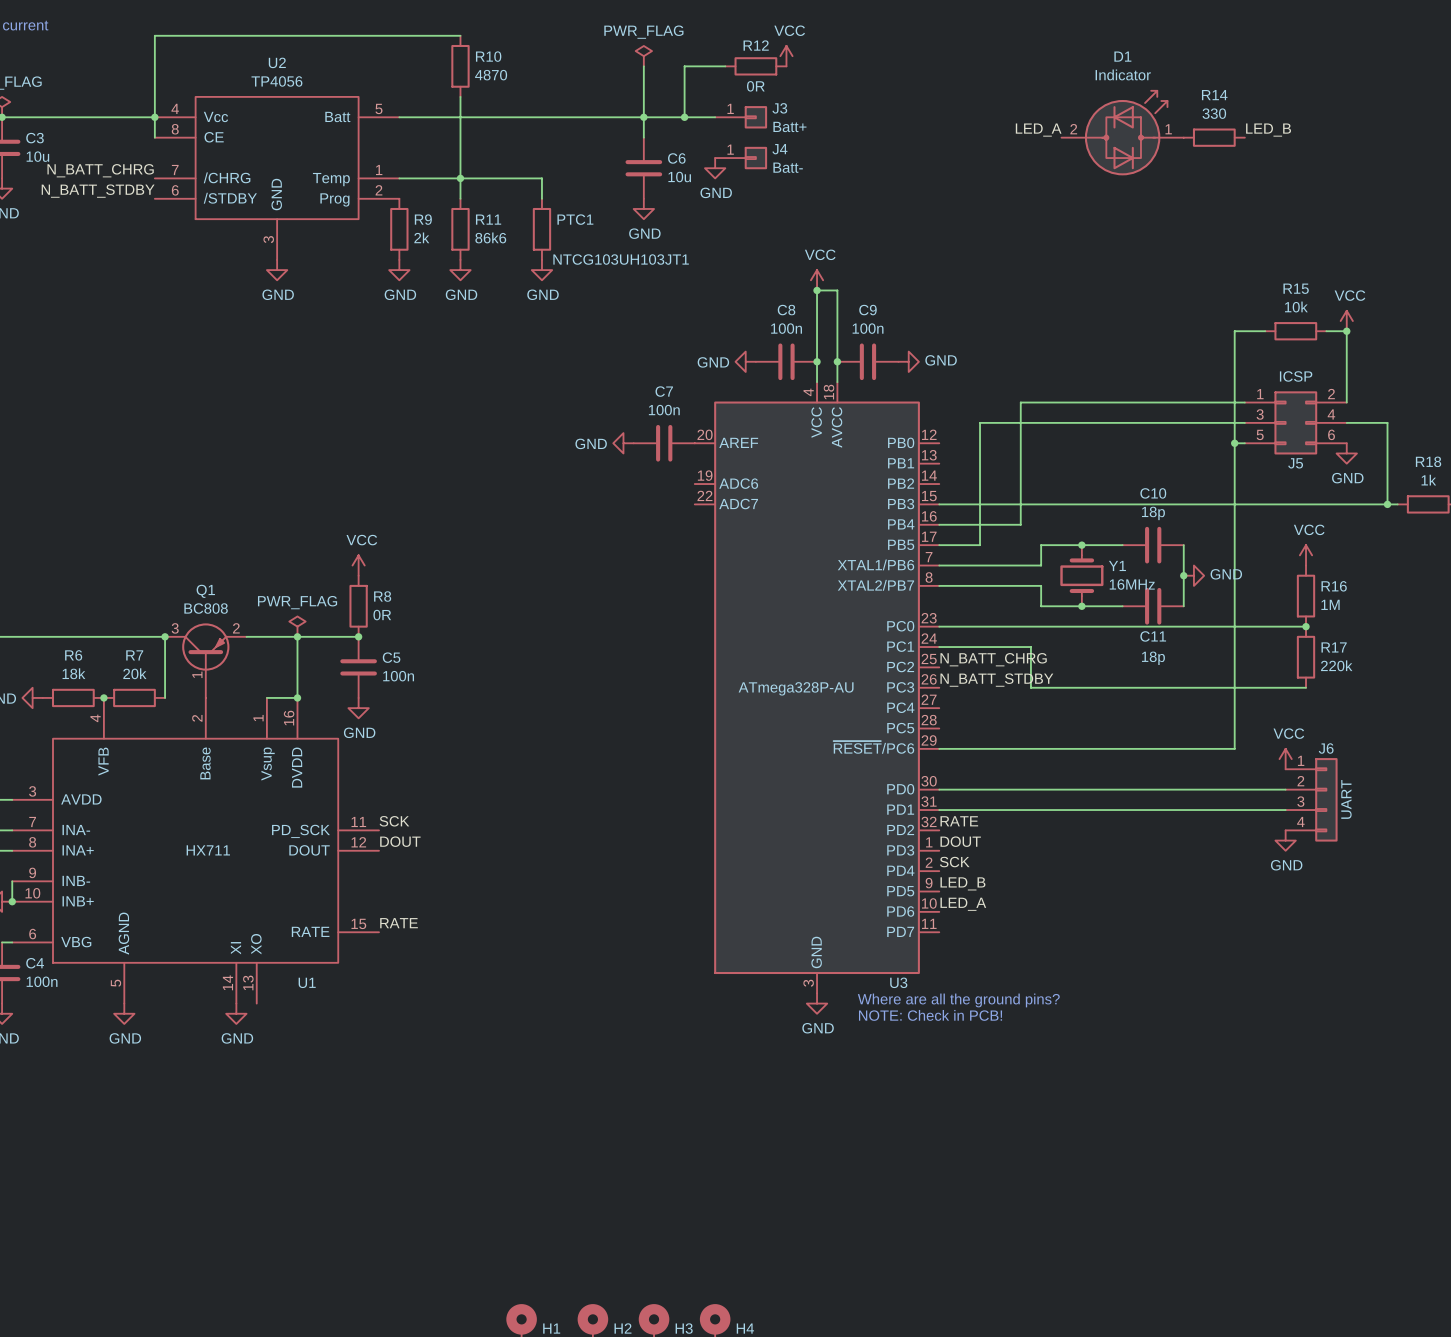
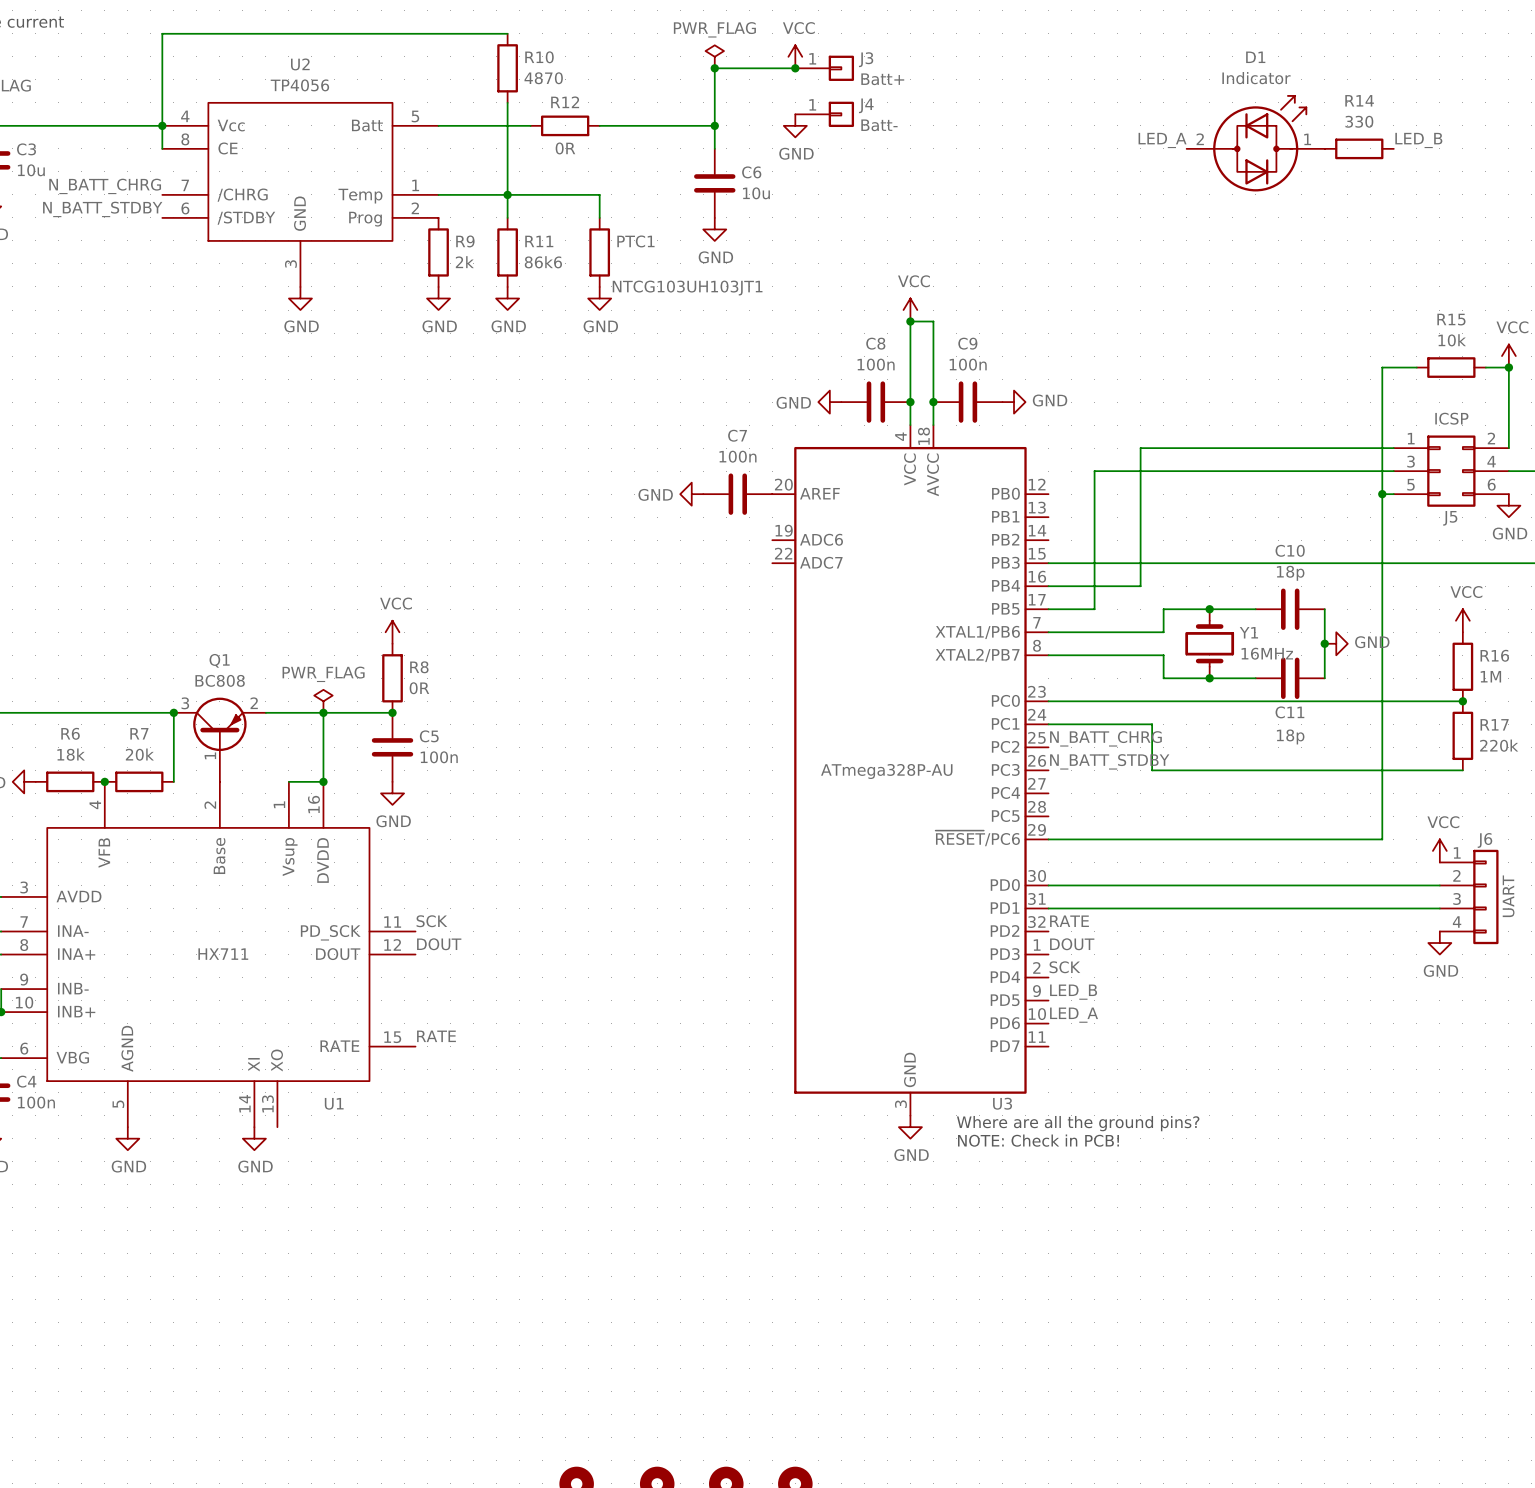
power symbol position: VCC (786, 56) -> VCC (795, 56)
junction: none -> (714, 68)
wire: (684, 66) (684, 117) -> (760, 68) (714, 68)
junction: none -> (795, 68)
R12 position: (755, 66) -> (565, 125)
wire: (480, 117) (541, 117) -> none
wire: (643, 117) (715, 117) -> none
junction: (684, 117) -> none
J3 position: (741, 117) -> (824, 68)
J4 position: (741, 158) -> (824, 114)
power symbol position: GND (715, 168) -> GND (795, 125)

